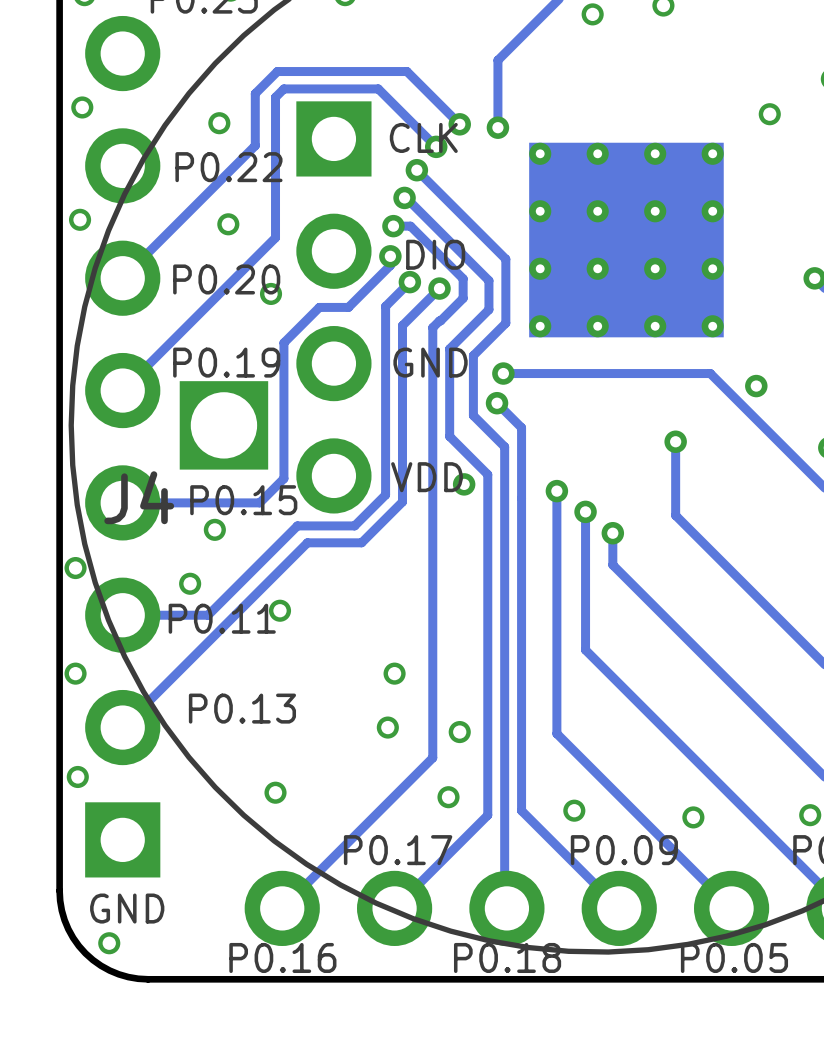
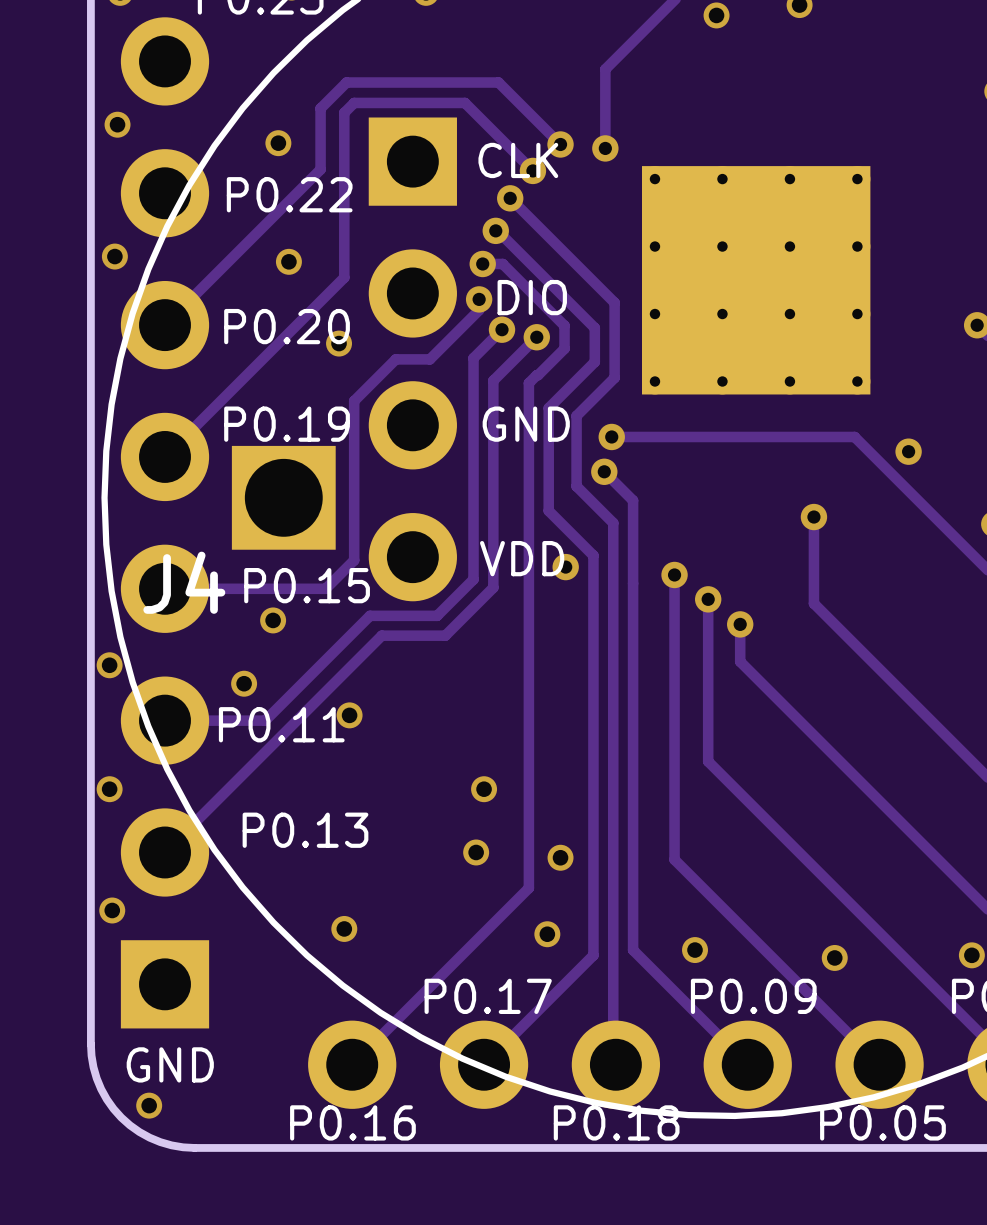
via: (769, 114) -> none

